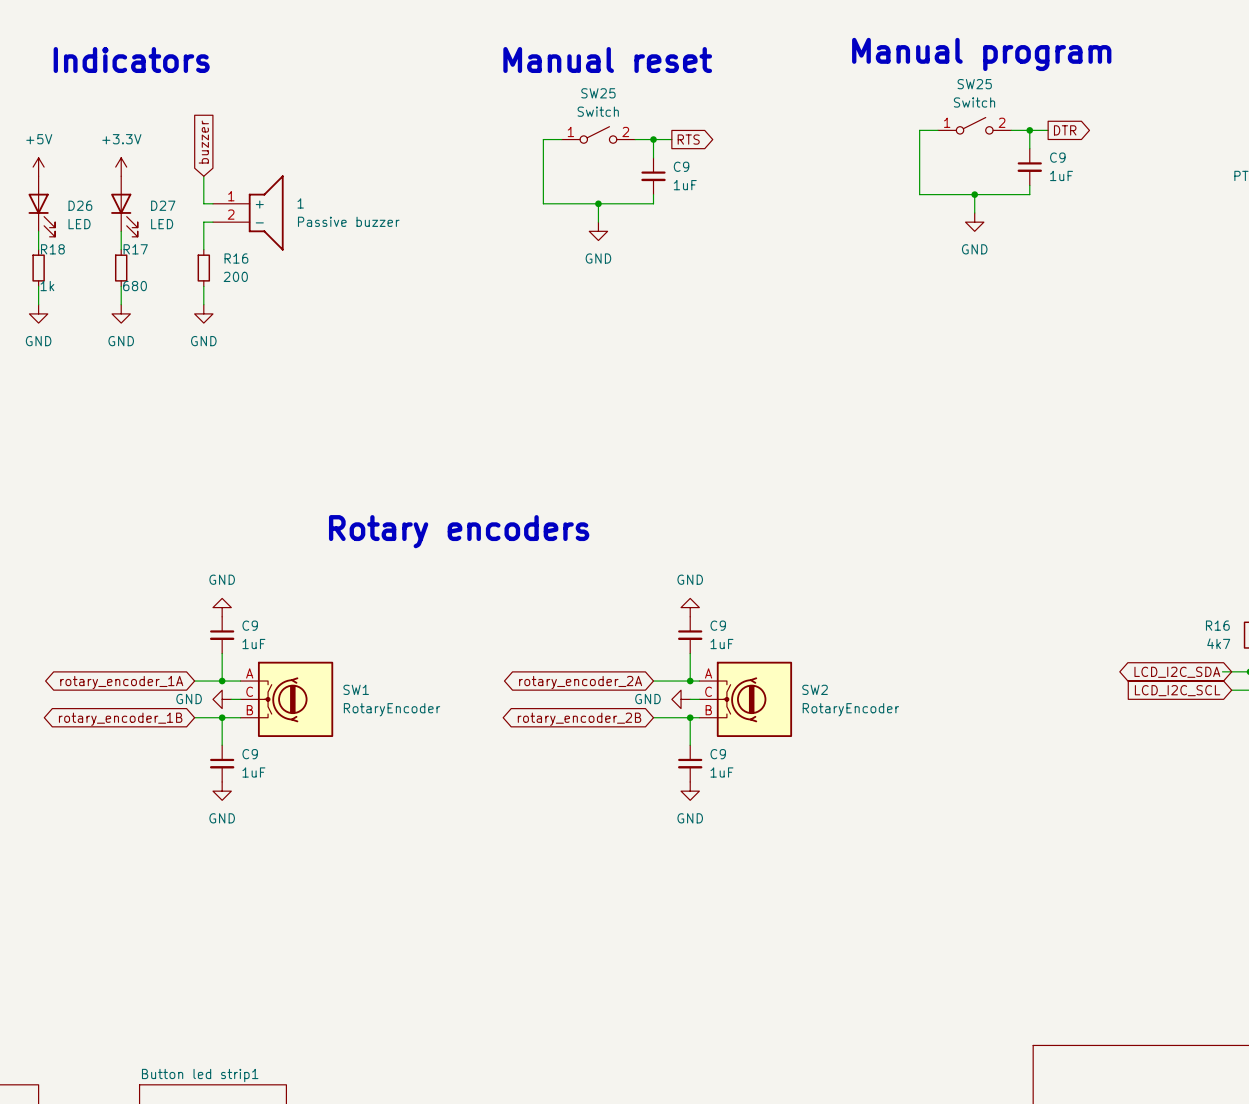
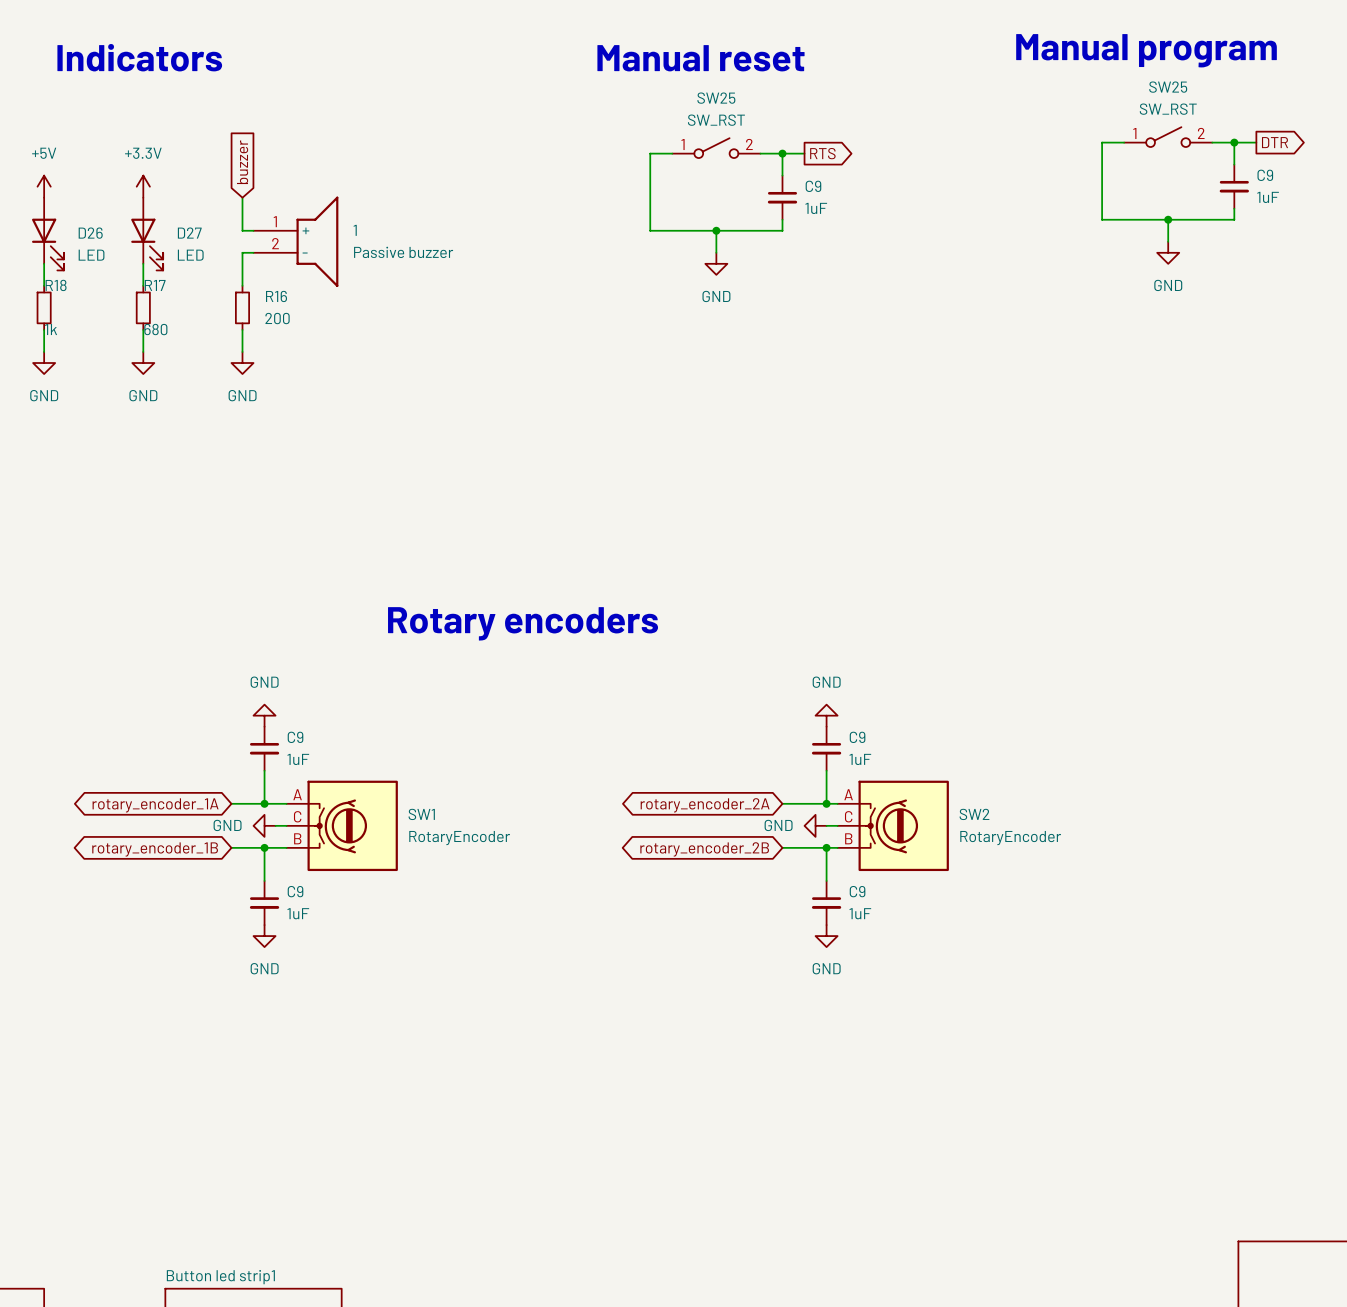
SW25 value: Switch (974, 102) -> SW_RST (1168, 109)
SW25 value: Switch (598, 111) -> SW_RST (716, 120)

